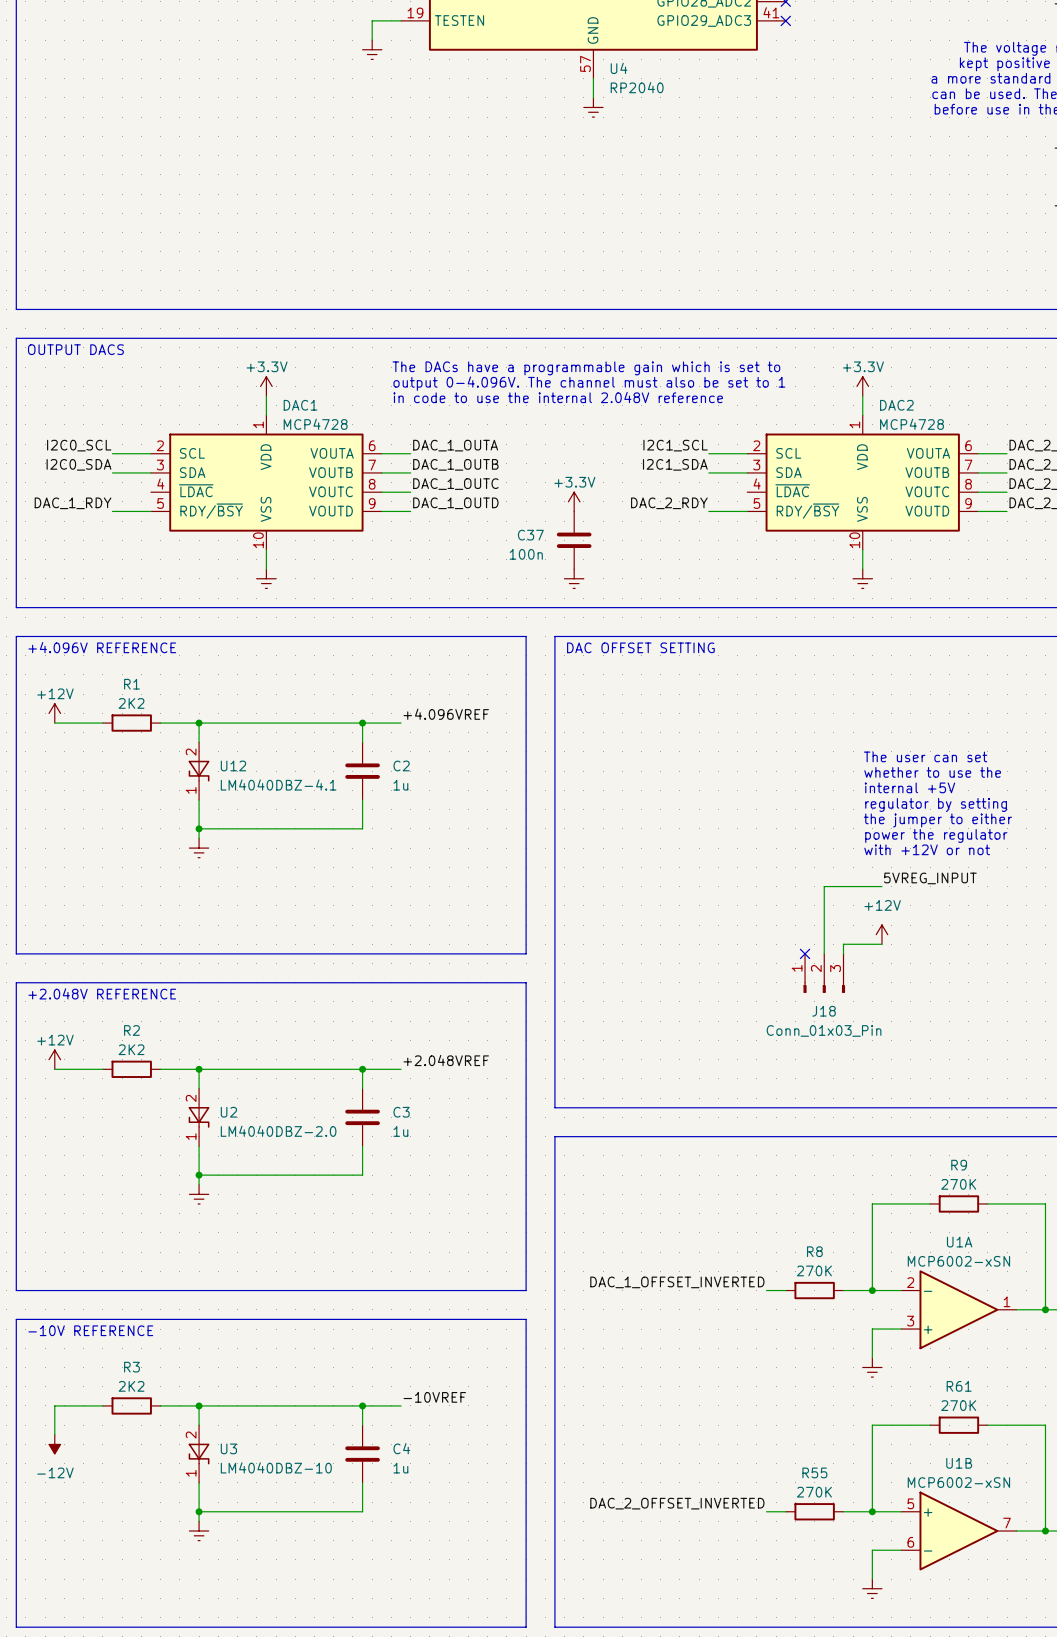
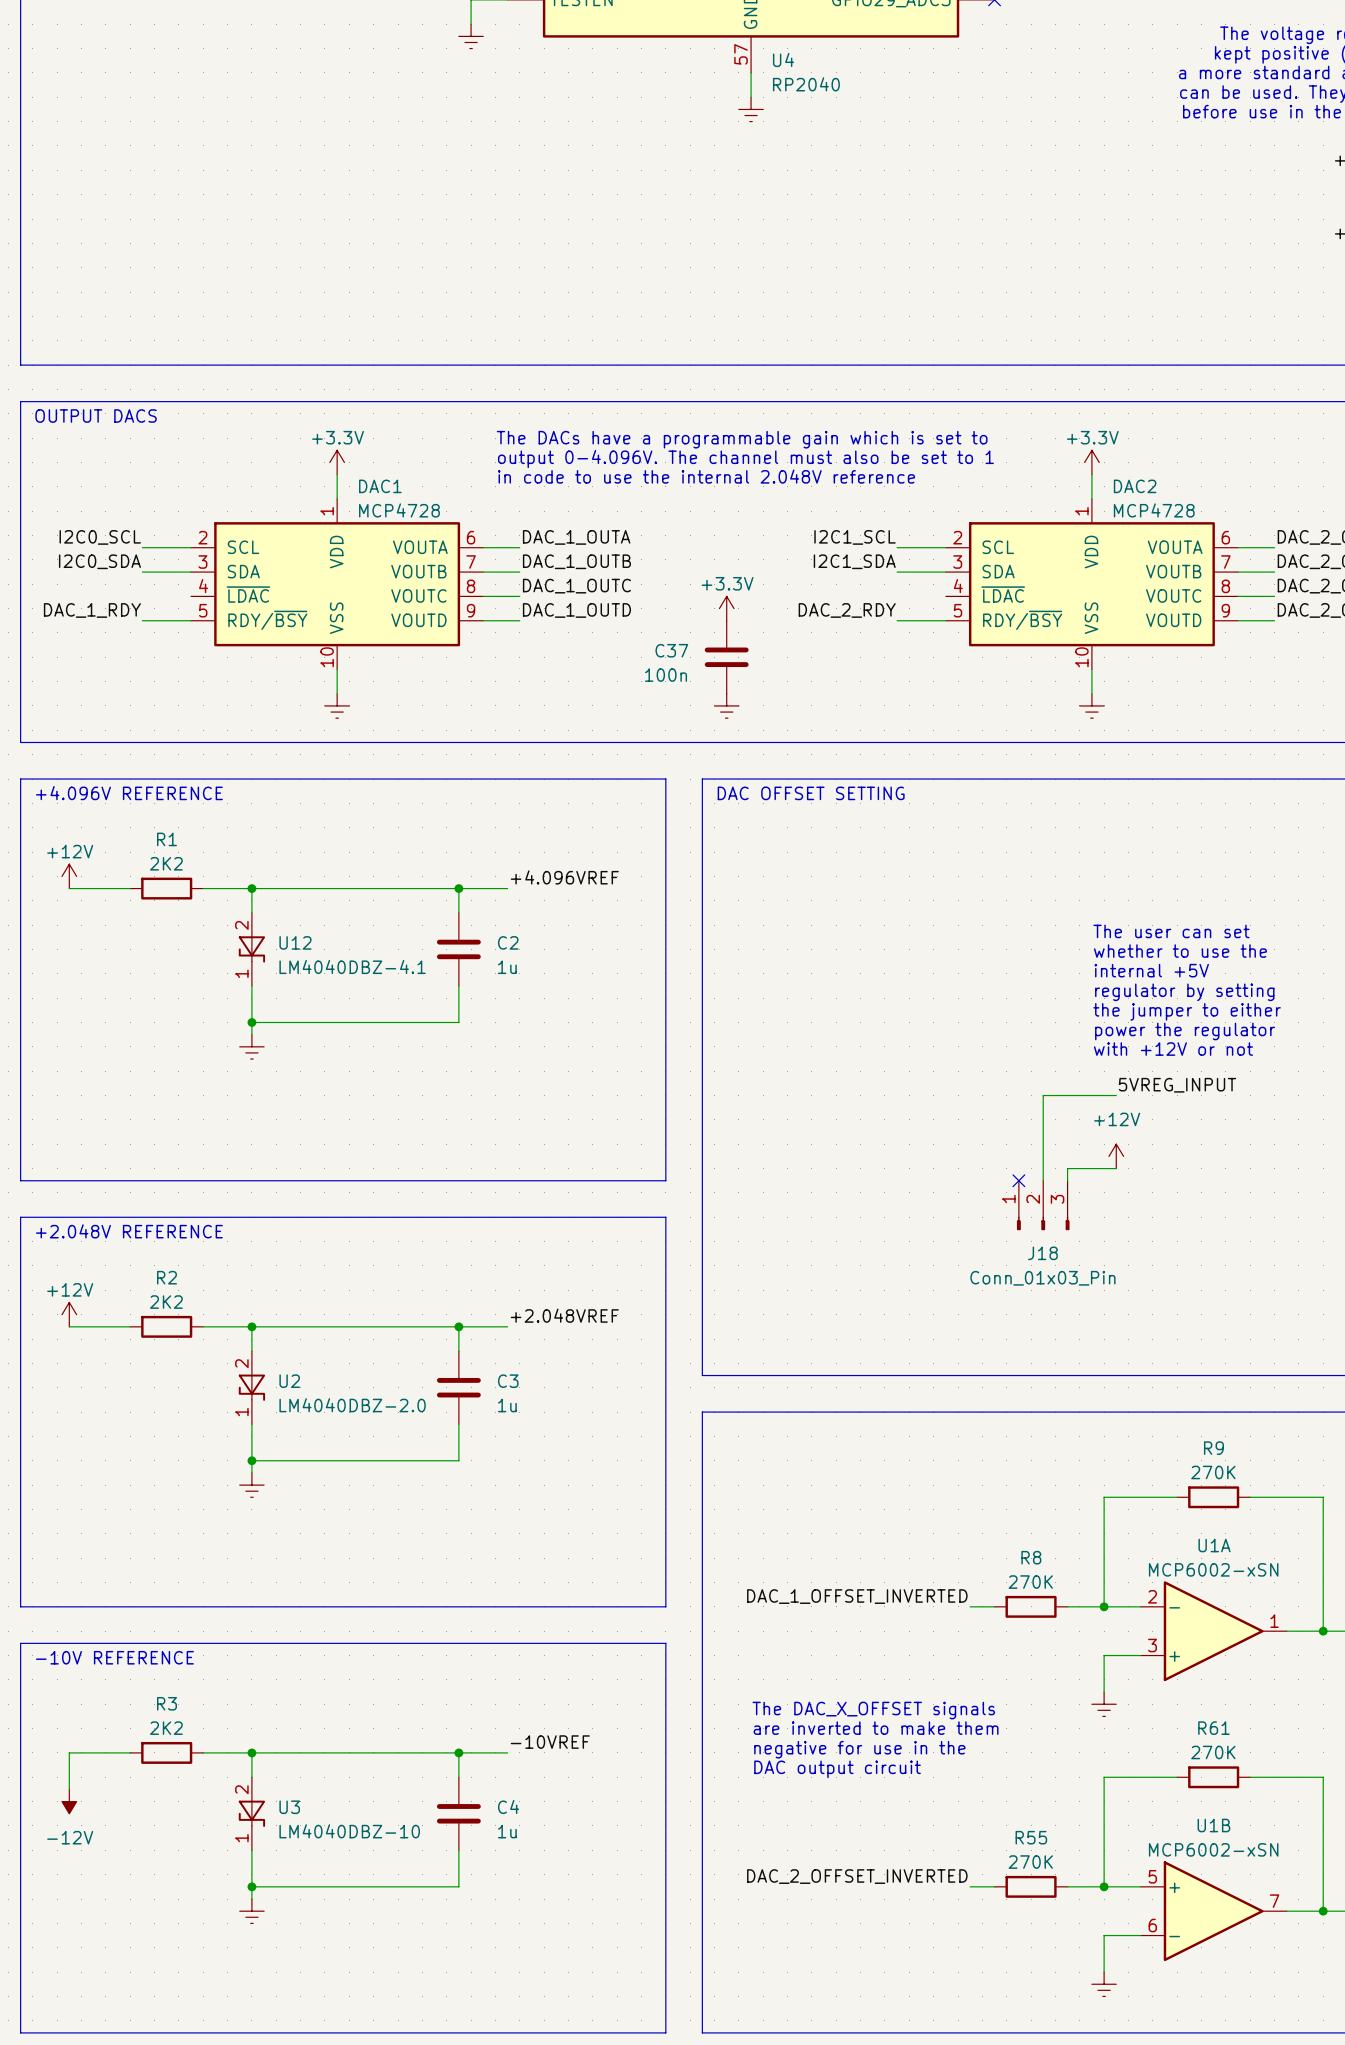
text: none -> The DAC_X_OFFSET signals (873, 1710)
text: none -> are inverted to make them (876, 1728)
text: none -> negative for use in the (859, 1749)
text: none -> DAC output circuit (837, 1769)

